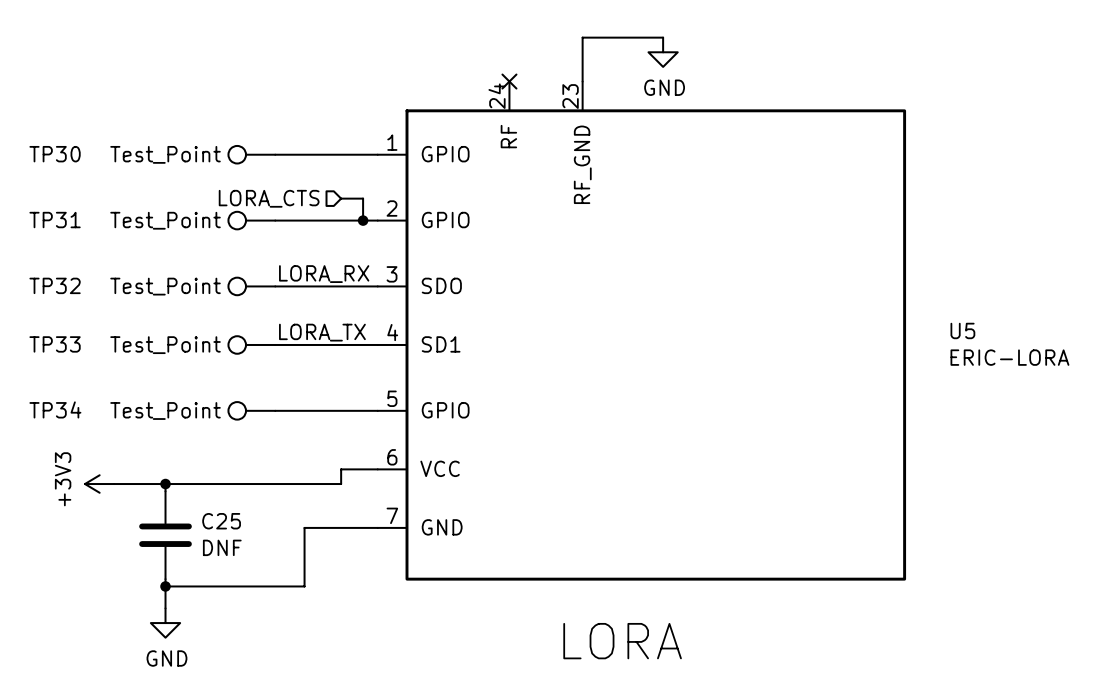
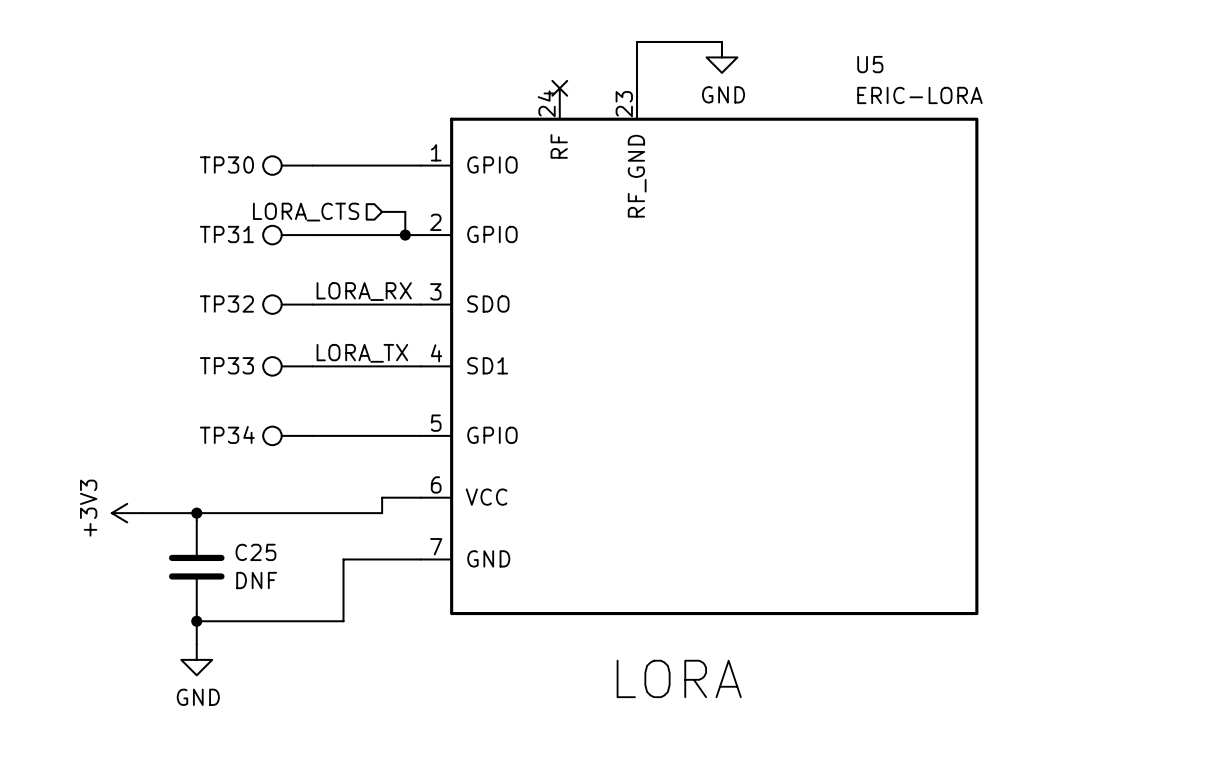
TP30 name position: TP30 (55, 154) -> TP30 (226, 164)
TP30 value: Test_Point (165, 154) -> none
TP31 name position: TP31 (55, 220) -> TP31 (226, 234)
TP31 value: Test_Point (165, 220) -> none
TP32 name position: TP32 (55, 285) -> TP32 (226, 304)
TP32 value: Test_Point (165, 286) -> none
U5 name position: U5 (962, 330) -> U5 (870, 64)
TP33 name position: TP33 (55, 344) -> TP33 (226, 365)
TP33 value: Test_Point (165, 345) -> none
U5 value position: ERIC-LORA (1009, 357) -> ERIC-LORA (919, 95)
TP34 name position: TP34 (55, 409) -> TP34 (227, 434)
TP34 value: Test_Point (165, 410) -> none

